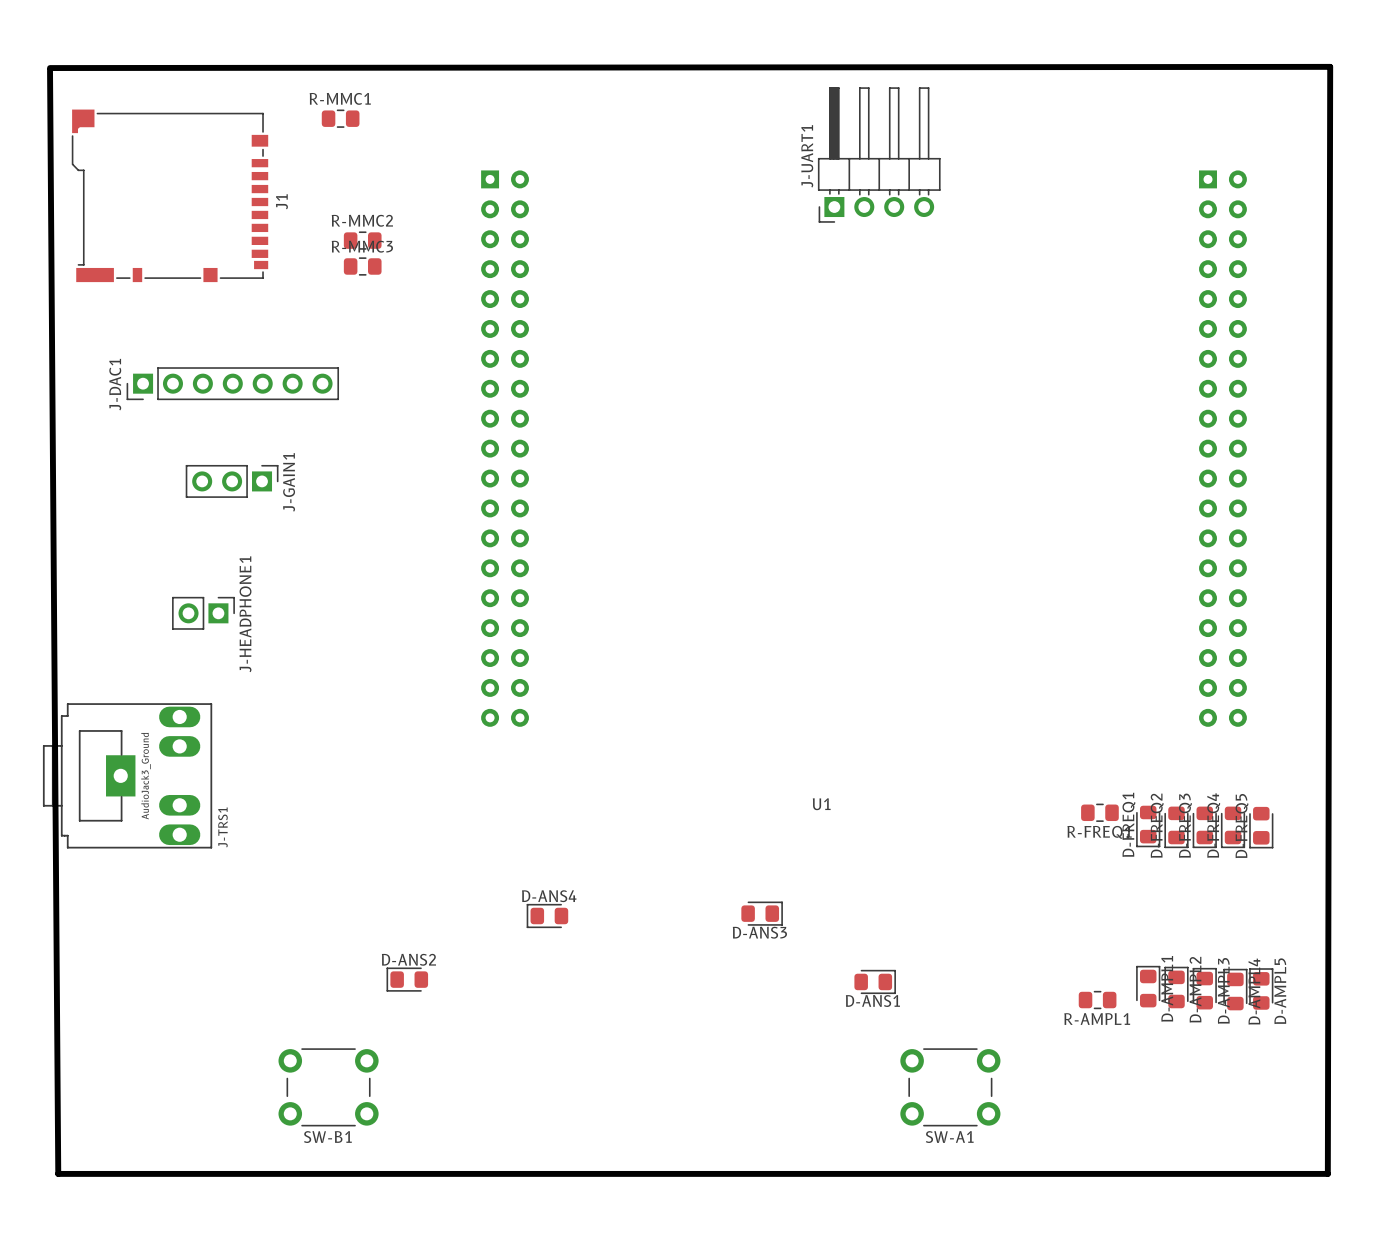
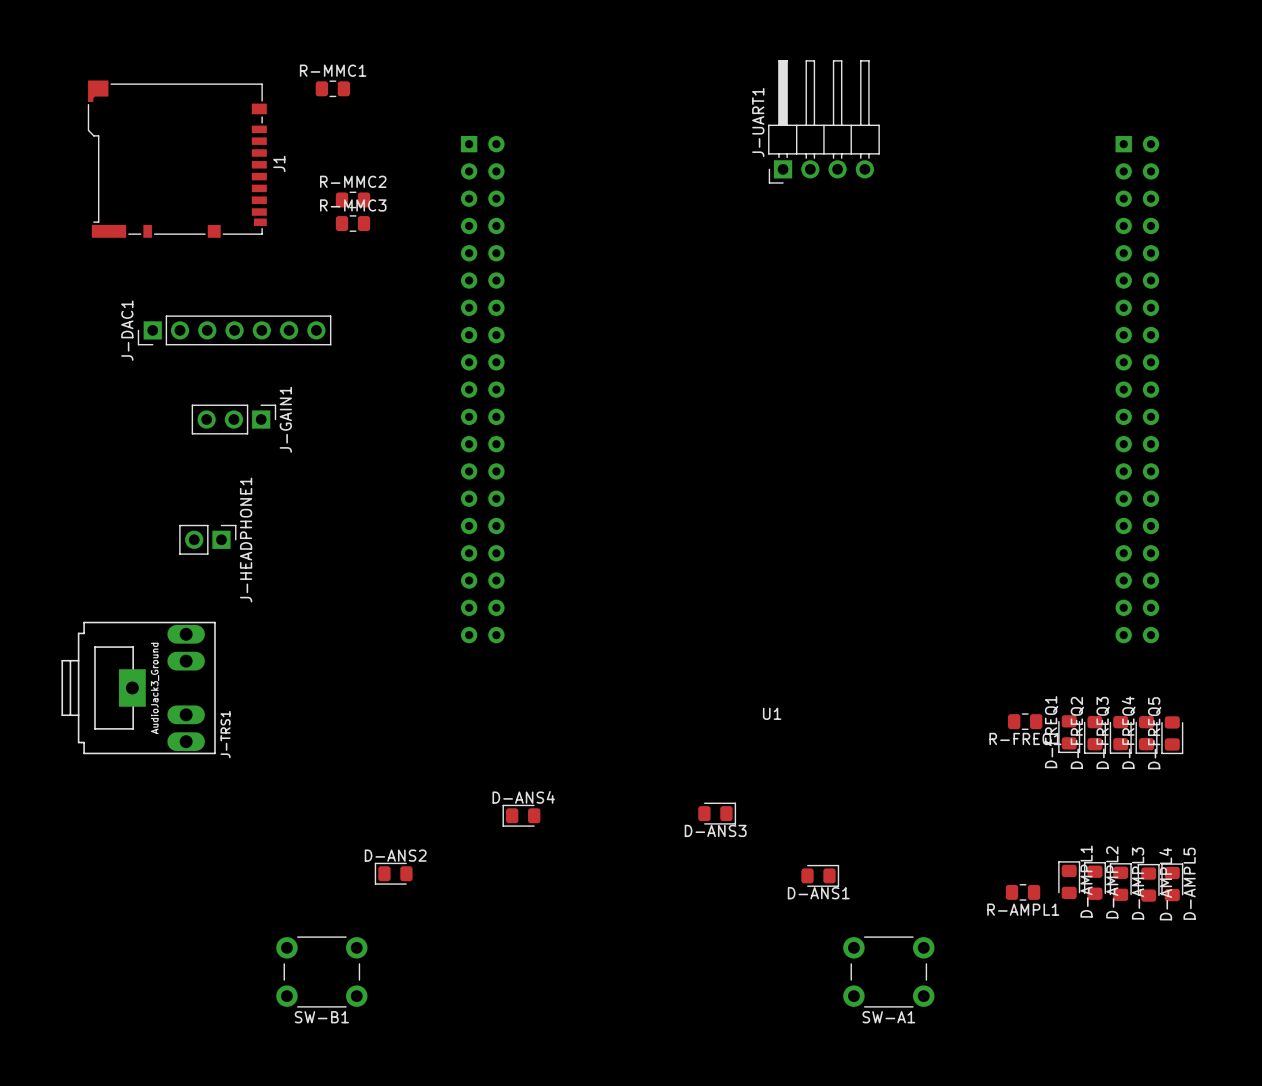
board edge: (50, 68) (1330, 66) (1327, 1173) (58, 1173) (50, 70) -> none

